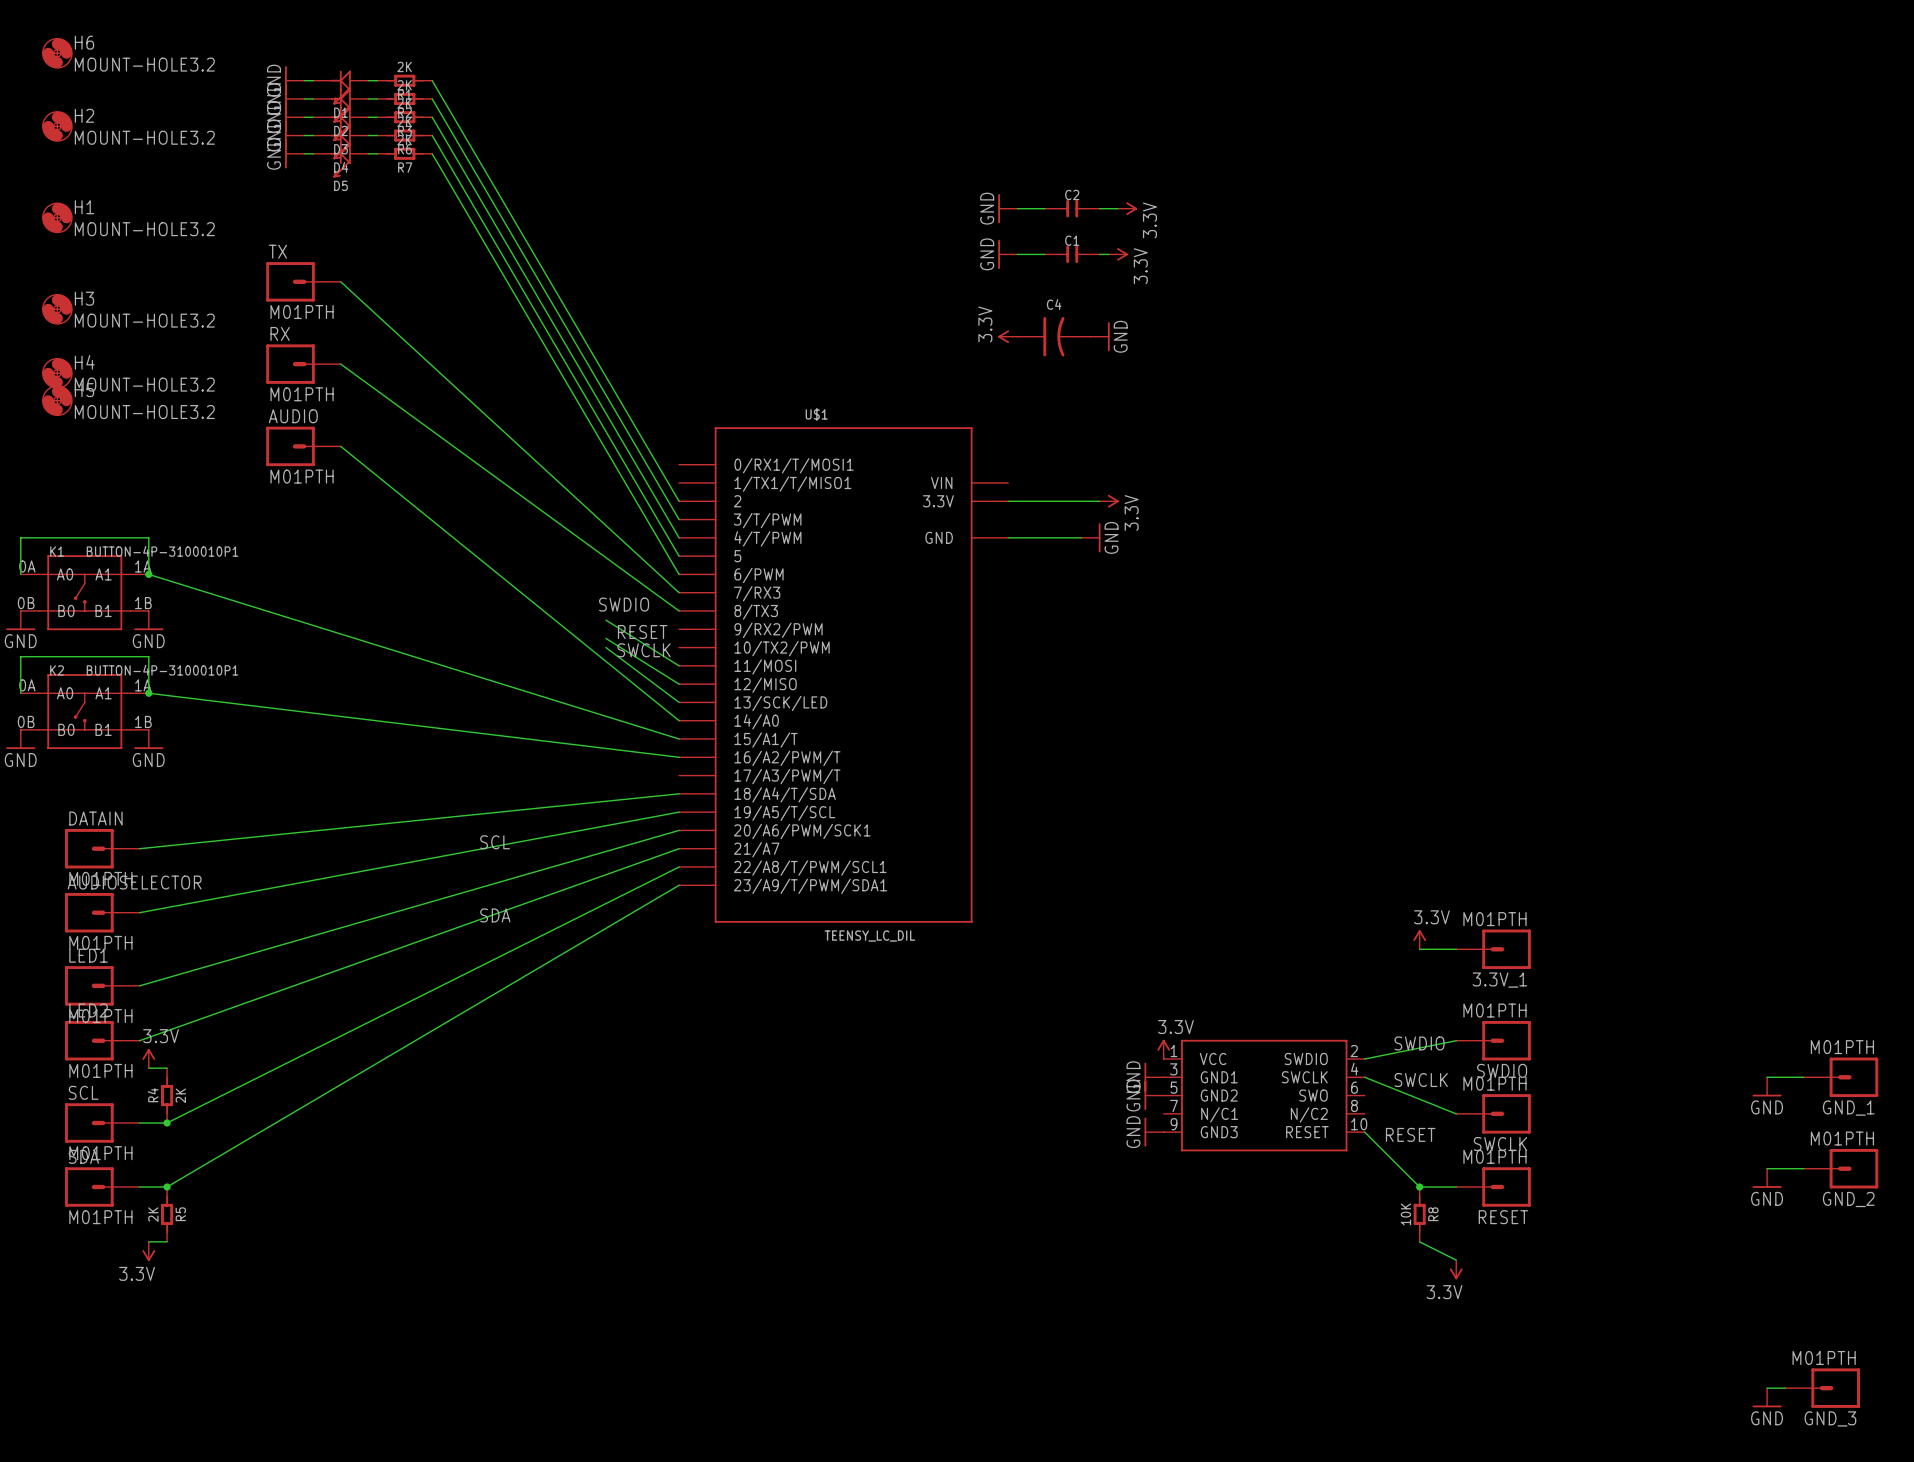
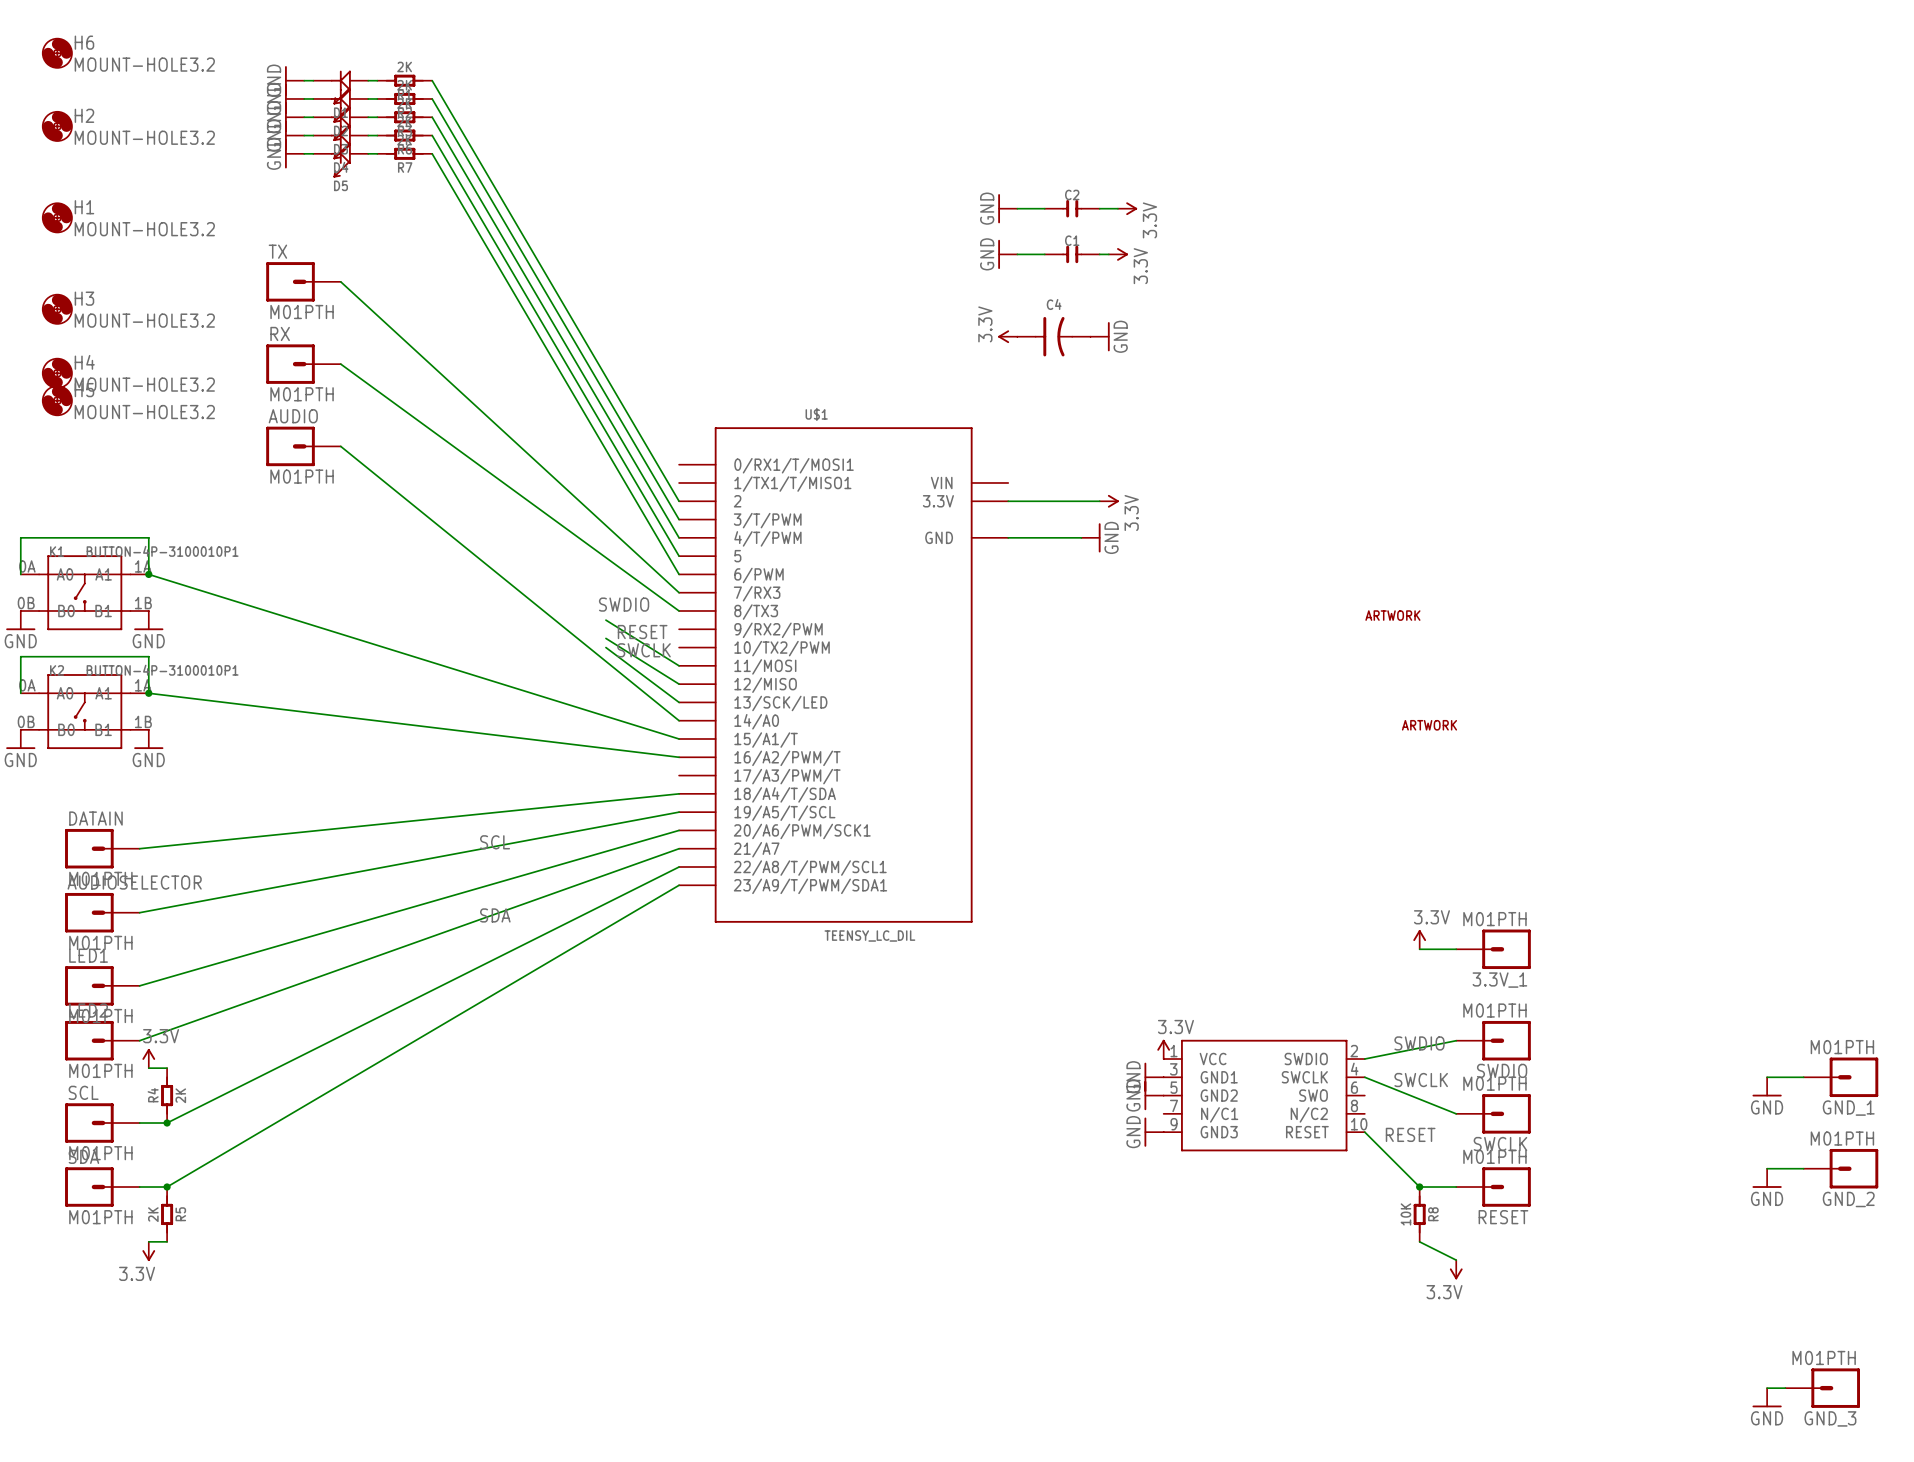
part: none -> (1392, 615)
part: none -> (1429, 725)

